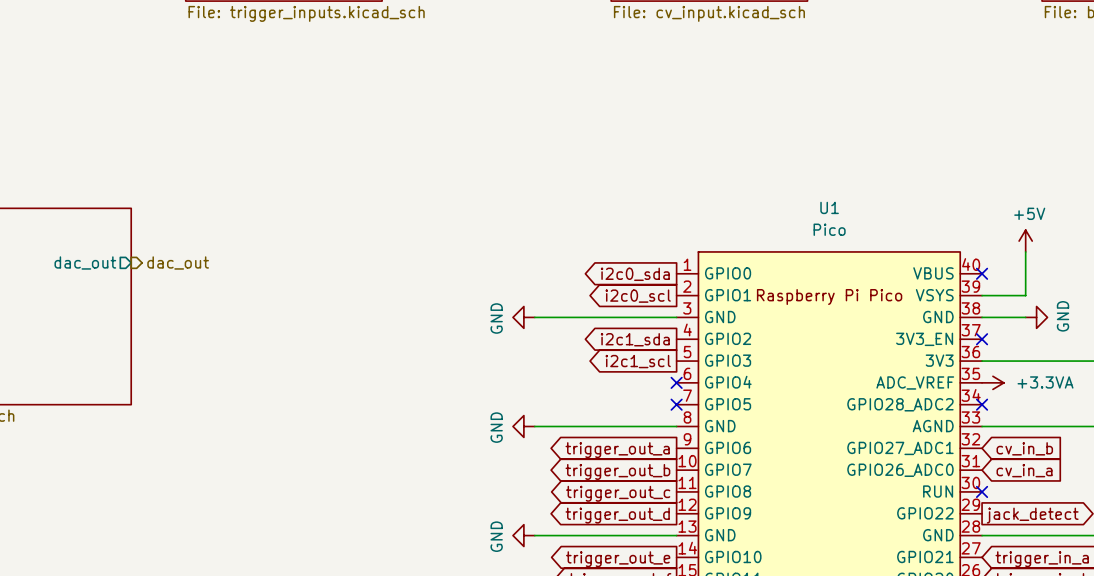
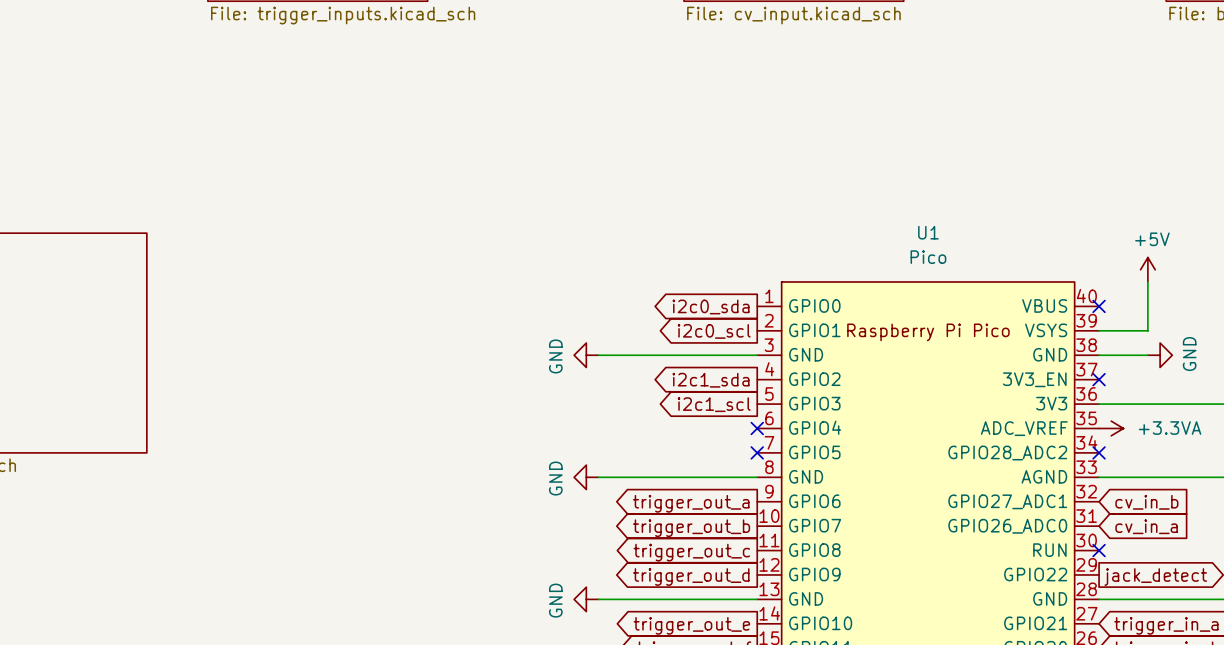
sheet pin: dac_out (85, 262) -> none
hierarchical label: dac_out (178, 262) -> none

